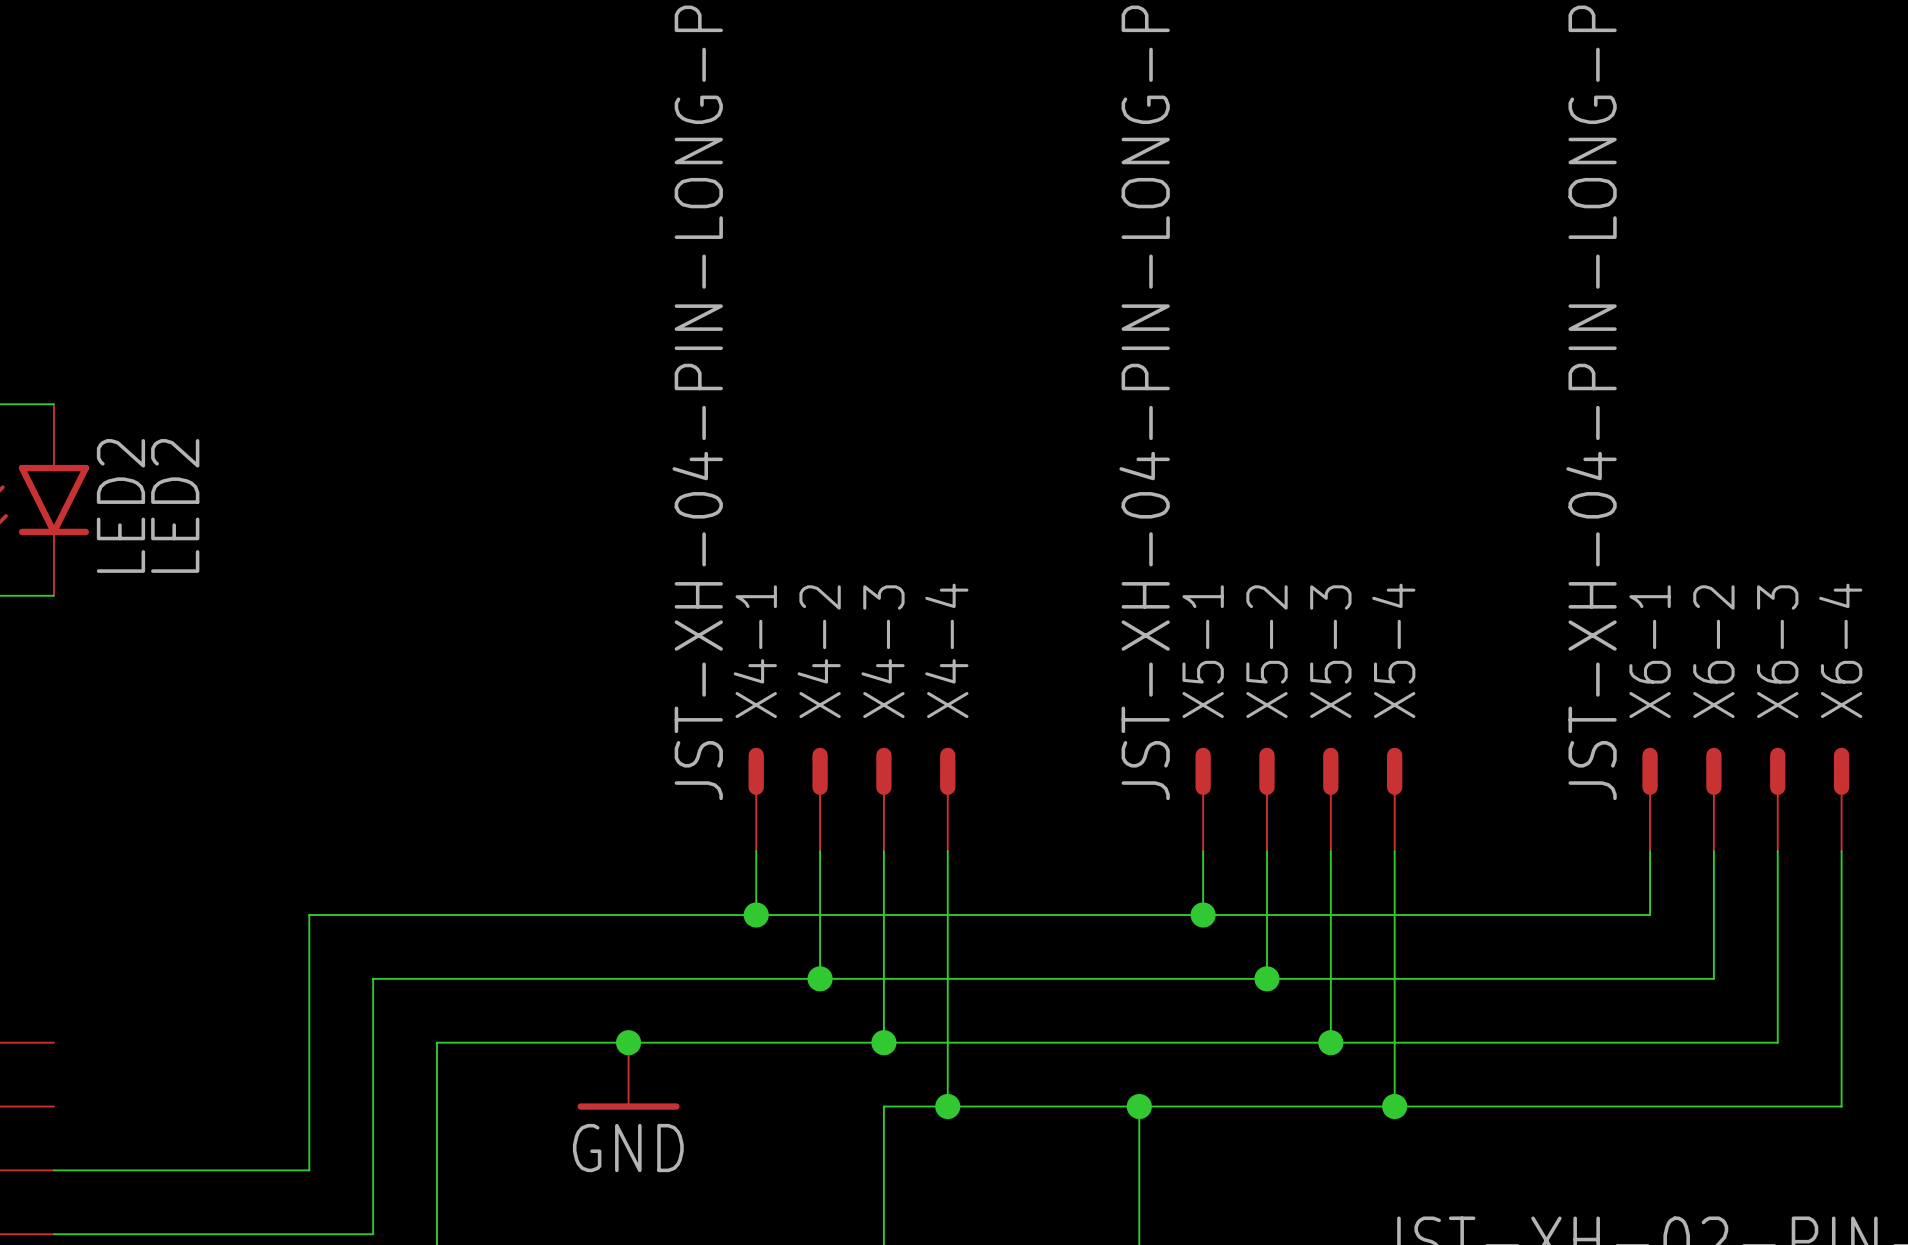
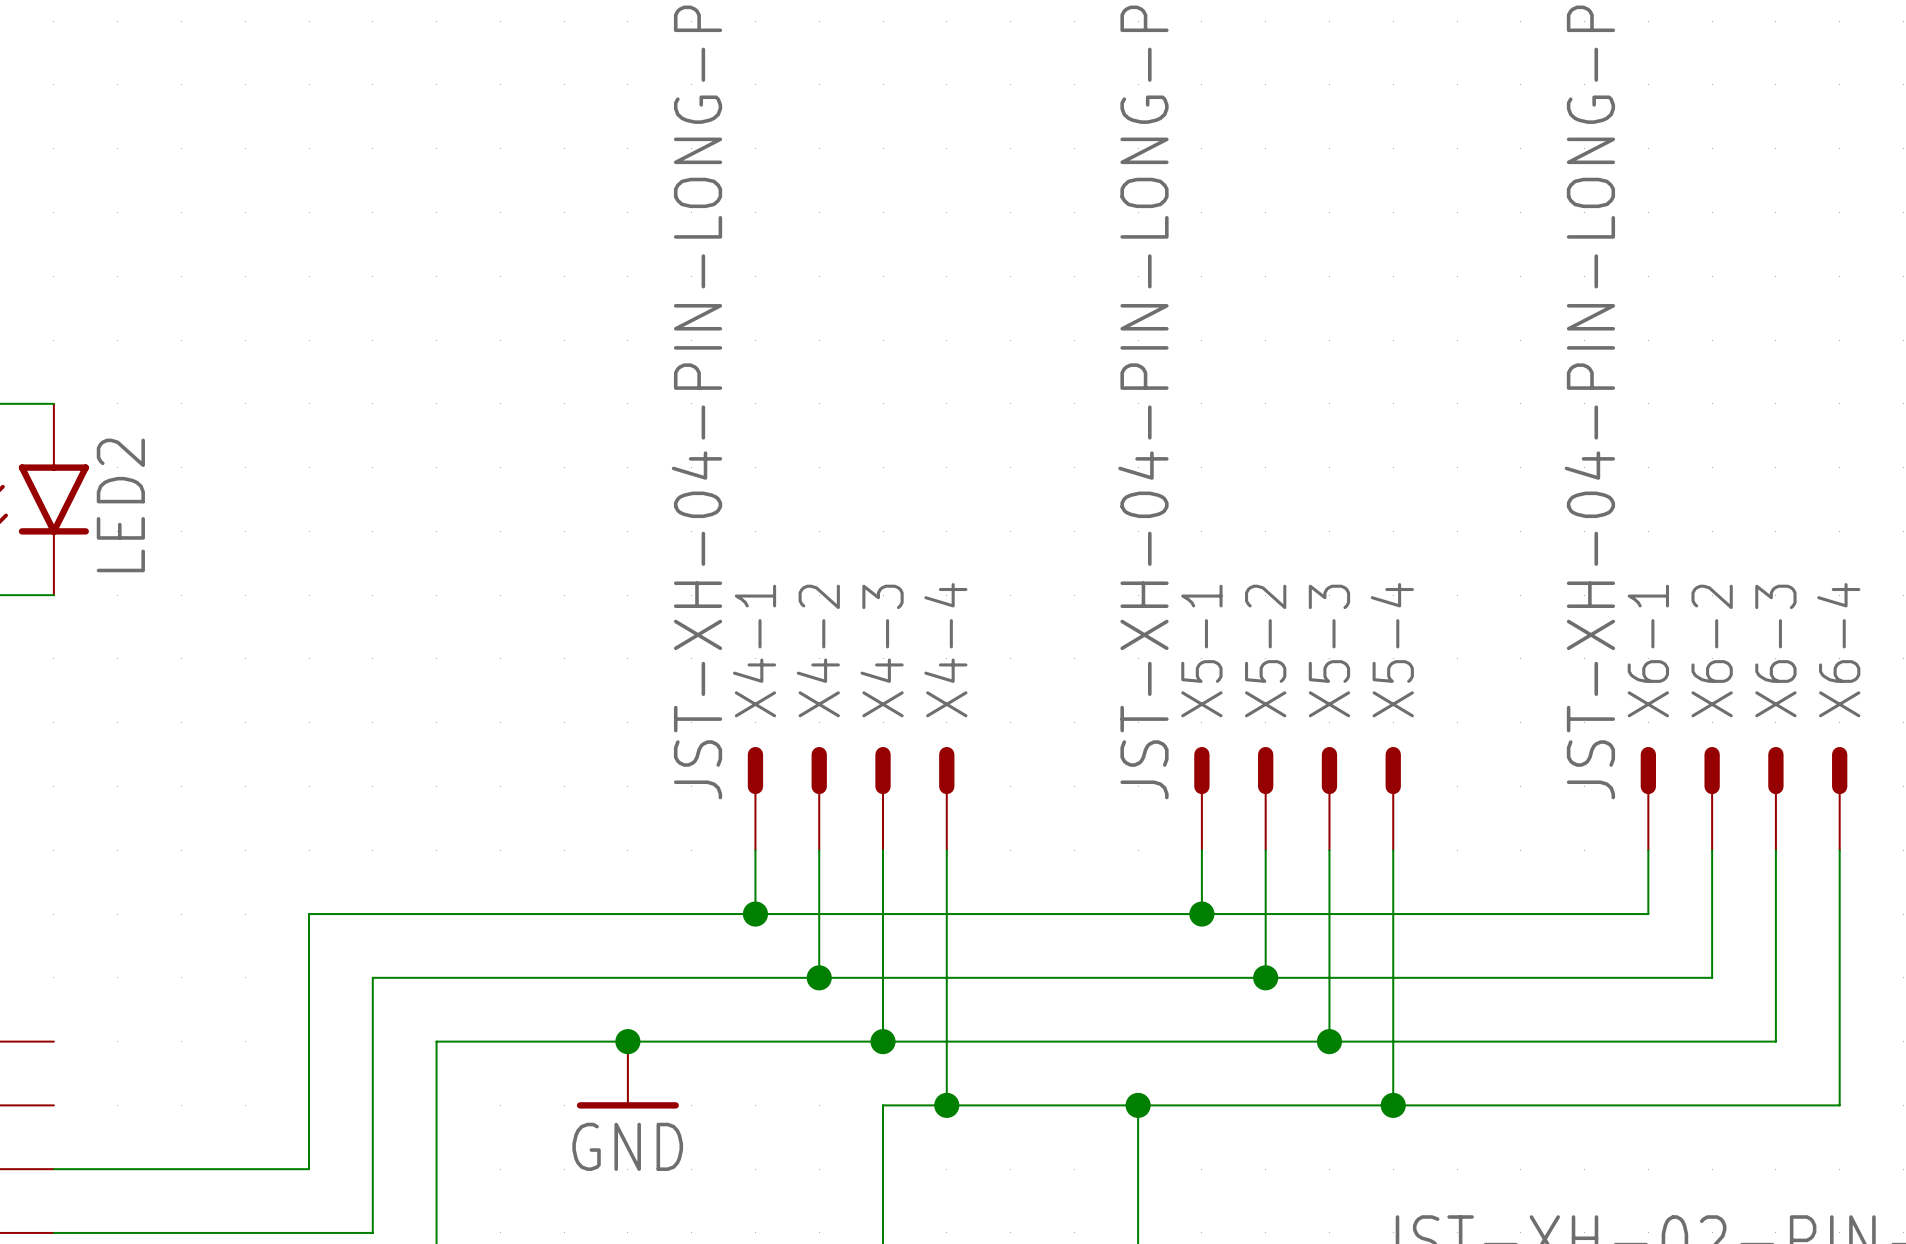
LED2 value: LED2 (175, 505) -> none

